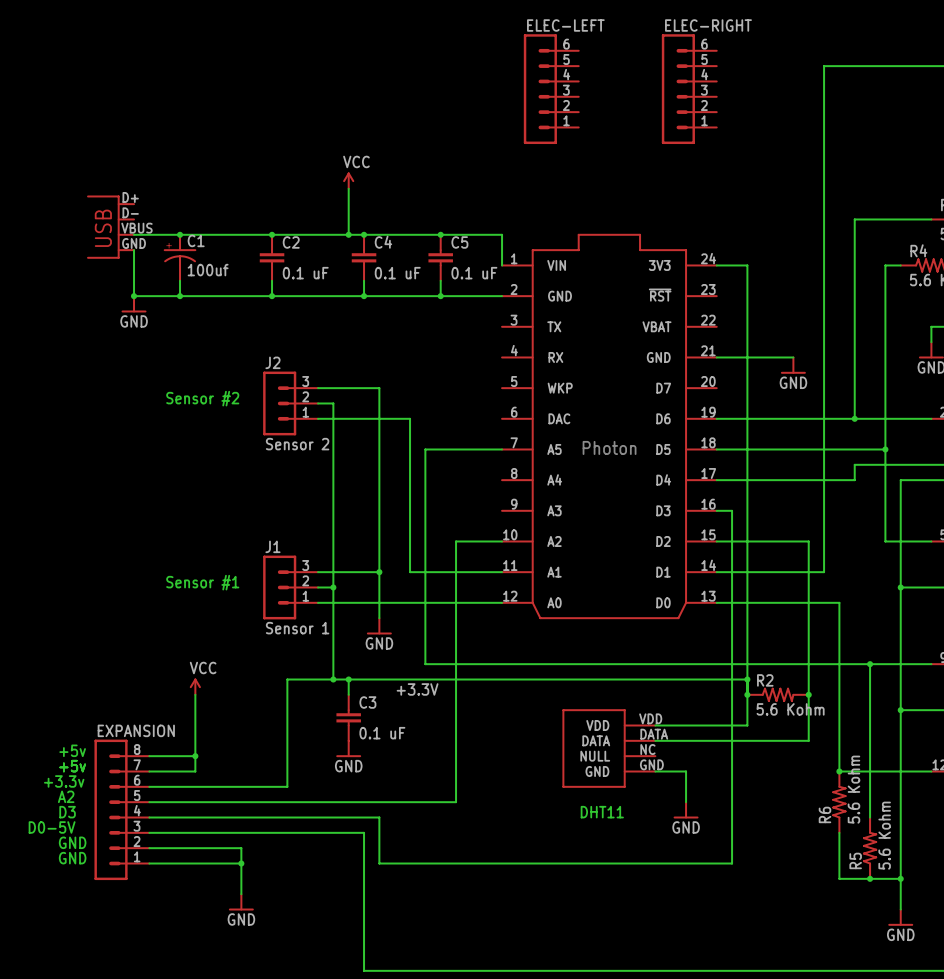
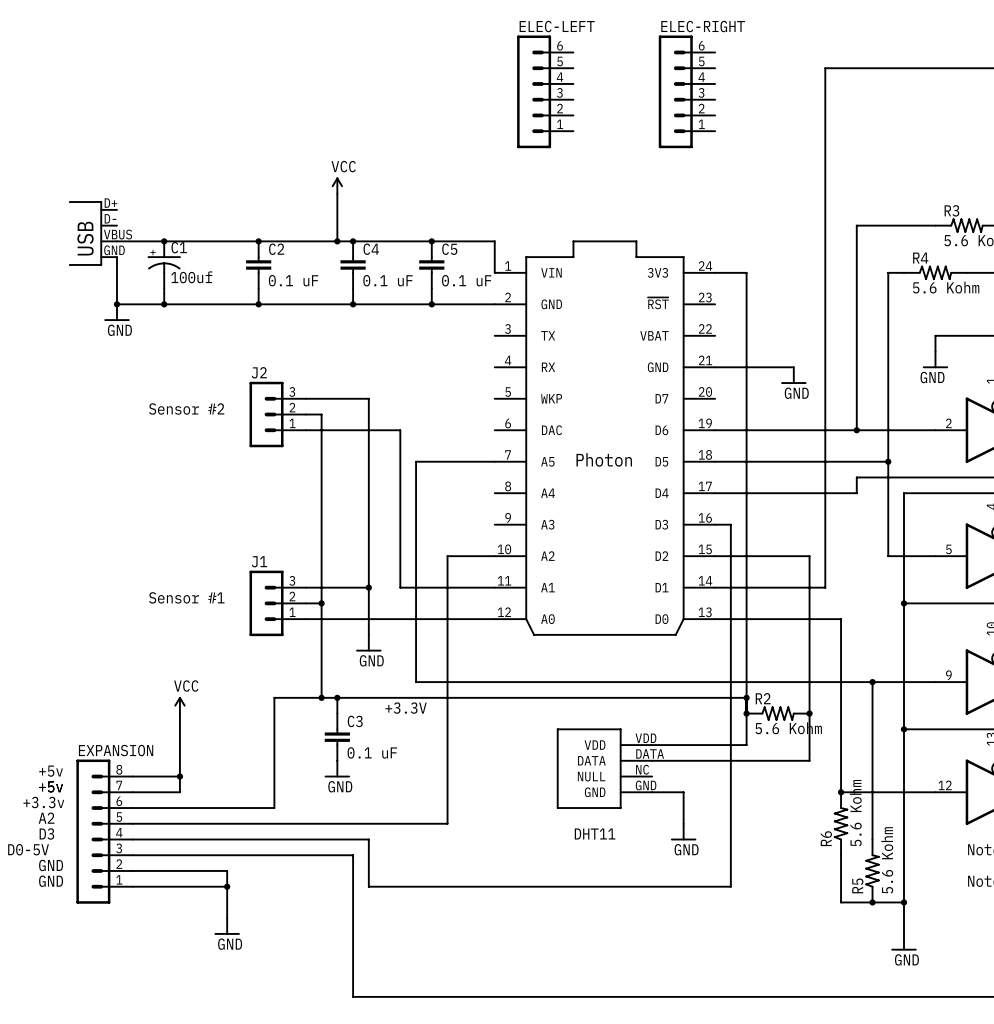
J2 value: Sensor 2 (297, 444) -> none
J1 value: Sensor 1 (297, 628) -> none

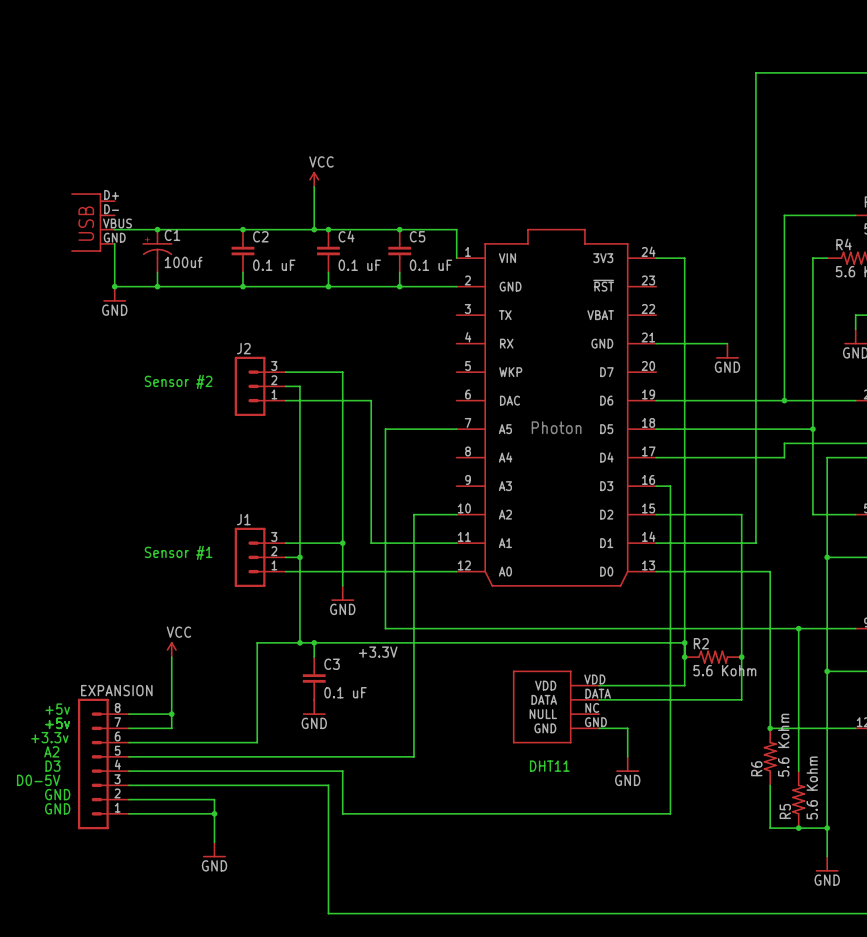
ELEC-LEFT: (545, 91) -> none
ELEC-RIGHT: (686, 91) -> none

